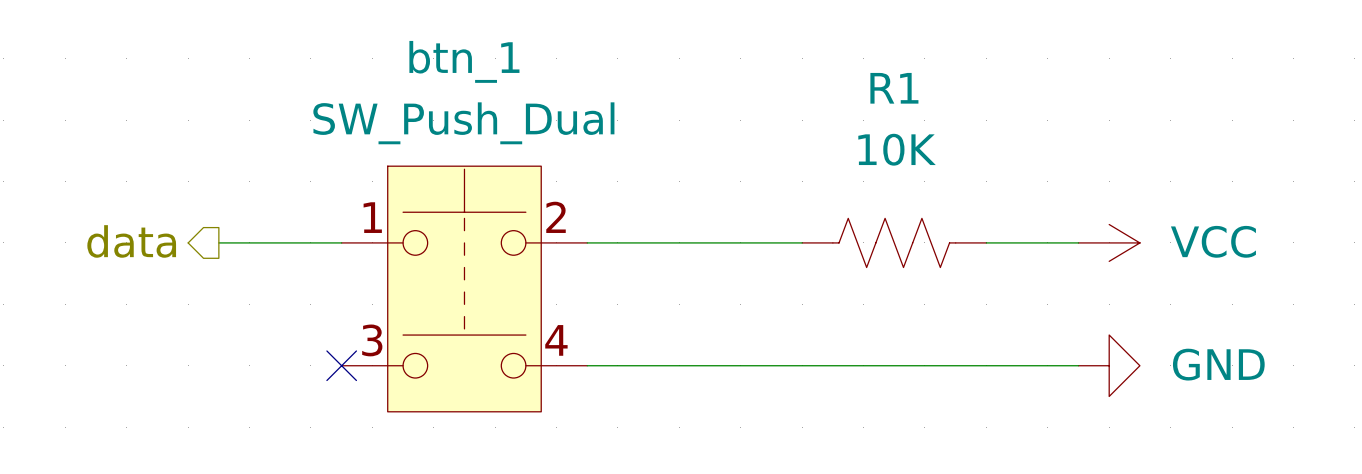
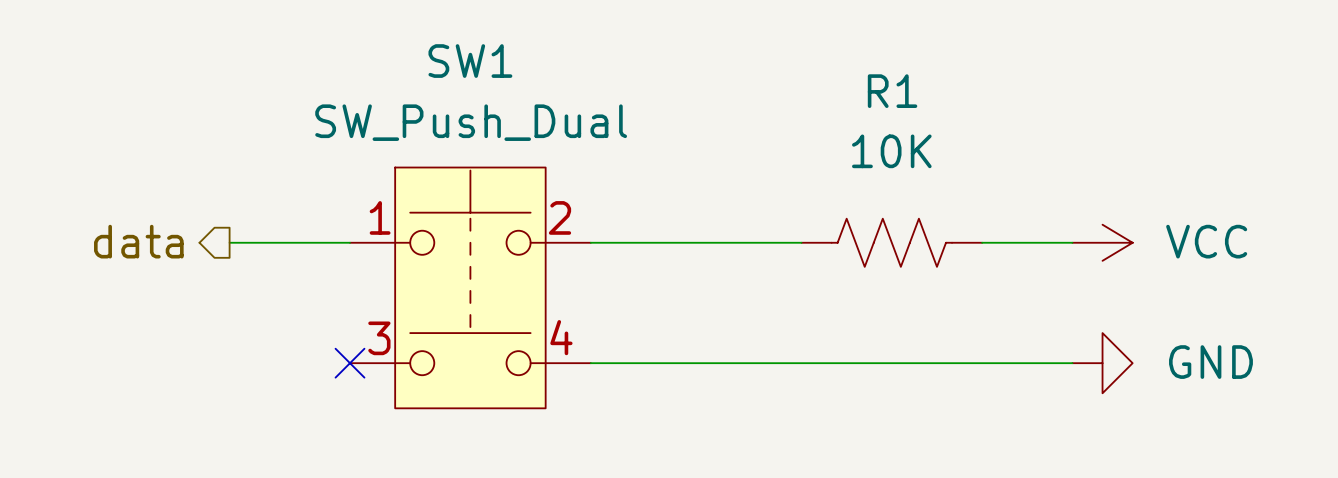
btn_1 name: btn_1 (464, 61) -> SW1 (470, 61)

